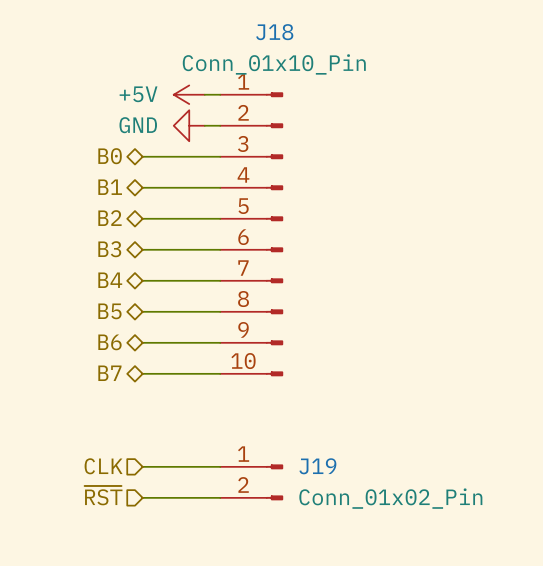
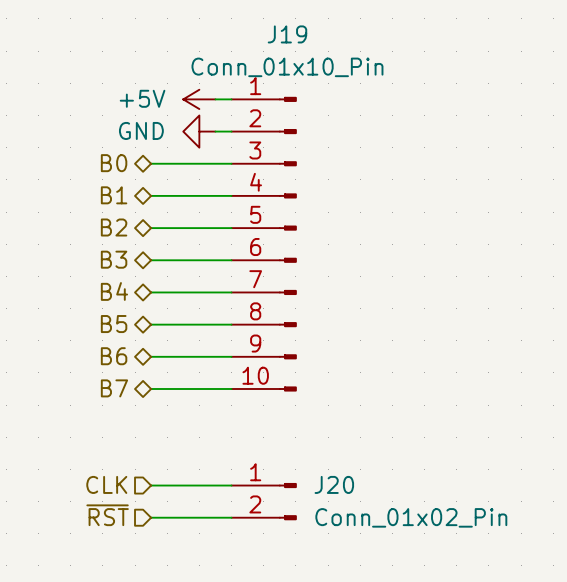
J18 name: J18 (274, 32) -> J19 (287, 34)
J19 name: J19 (317, 466) -> J20 (334, 484)

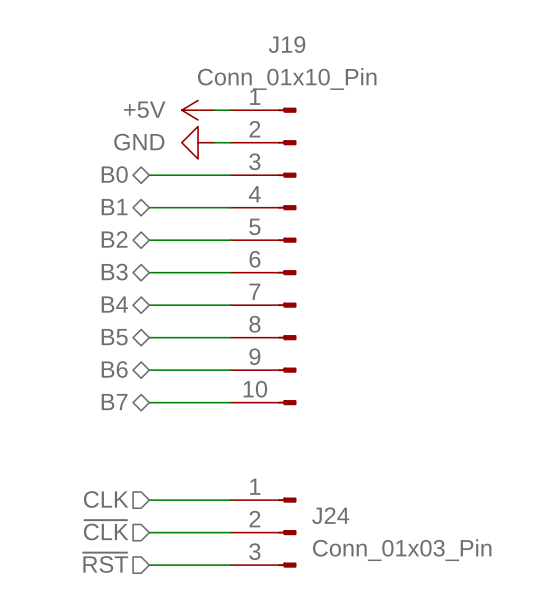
J20: Conn_01x02_Pin (264, 501) -> none
hierarchical label: ~{RST} (107, 515) -> ~{CLK} (106, 530)
J24: none -> Conn_01x03_Pin (263, 532)
hierarchical label: none -> ~{RST} (105, 562)
wire: none -> (149, 565) (230, 565)

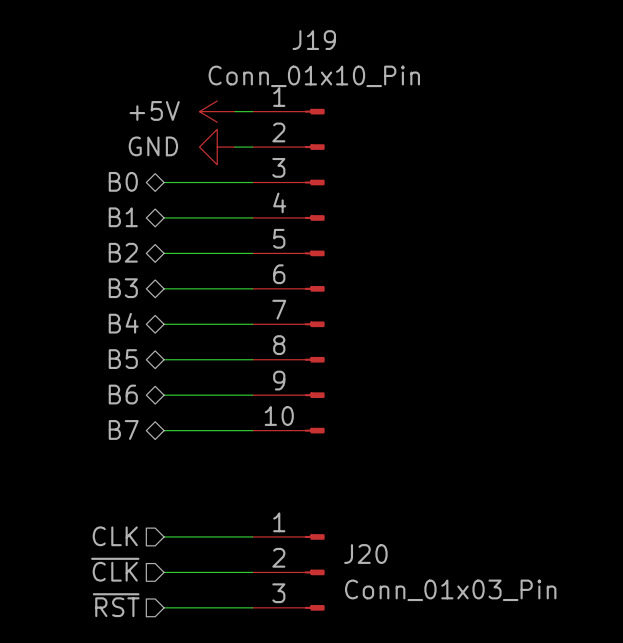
J24 name: J24 (330, 515) -> J20 (365, 554)

